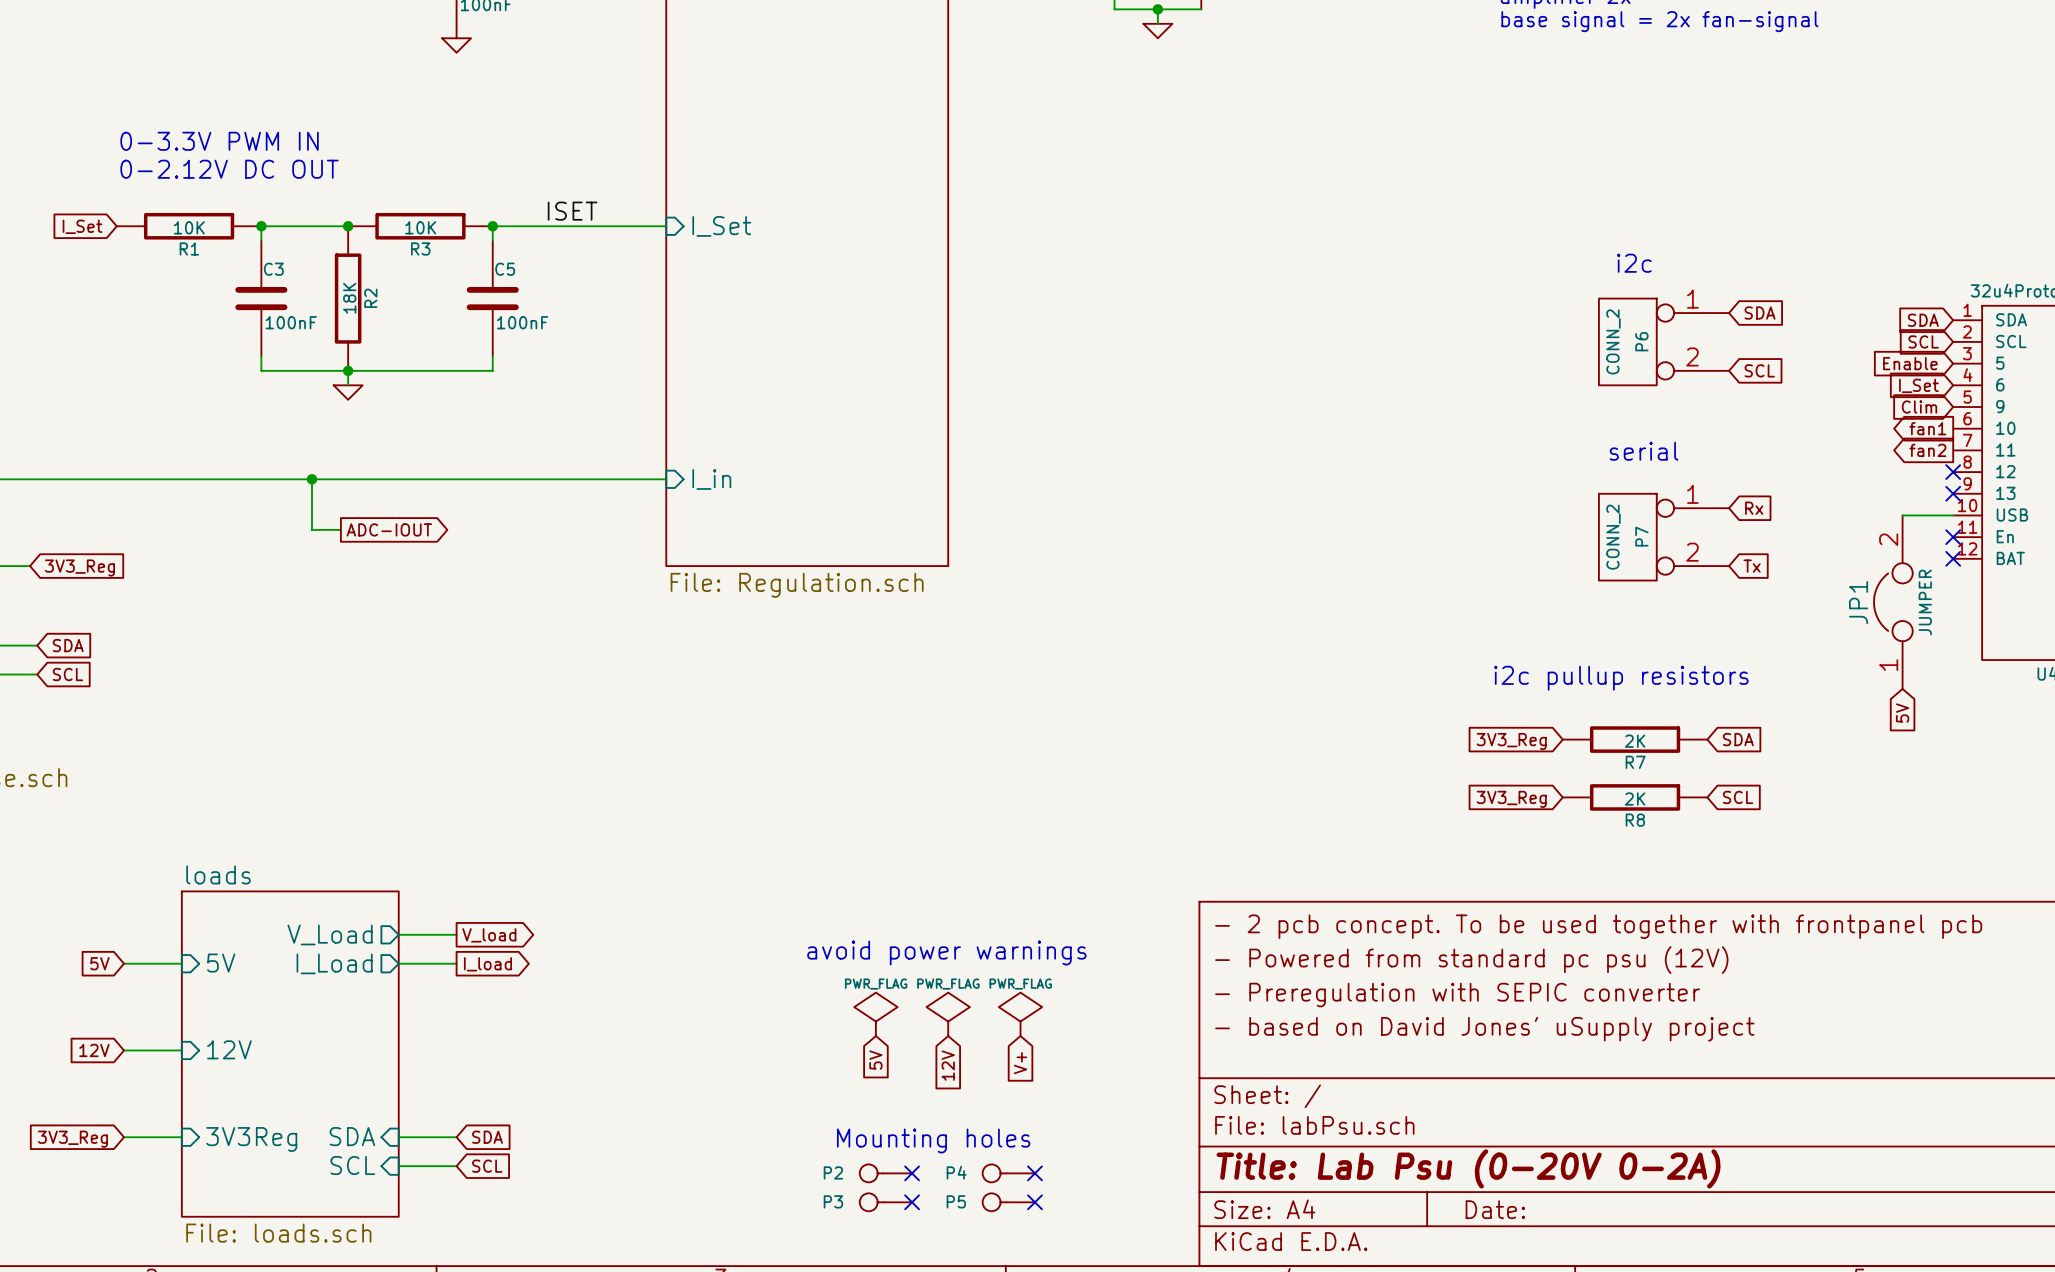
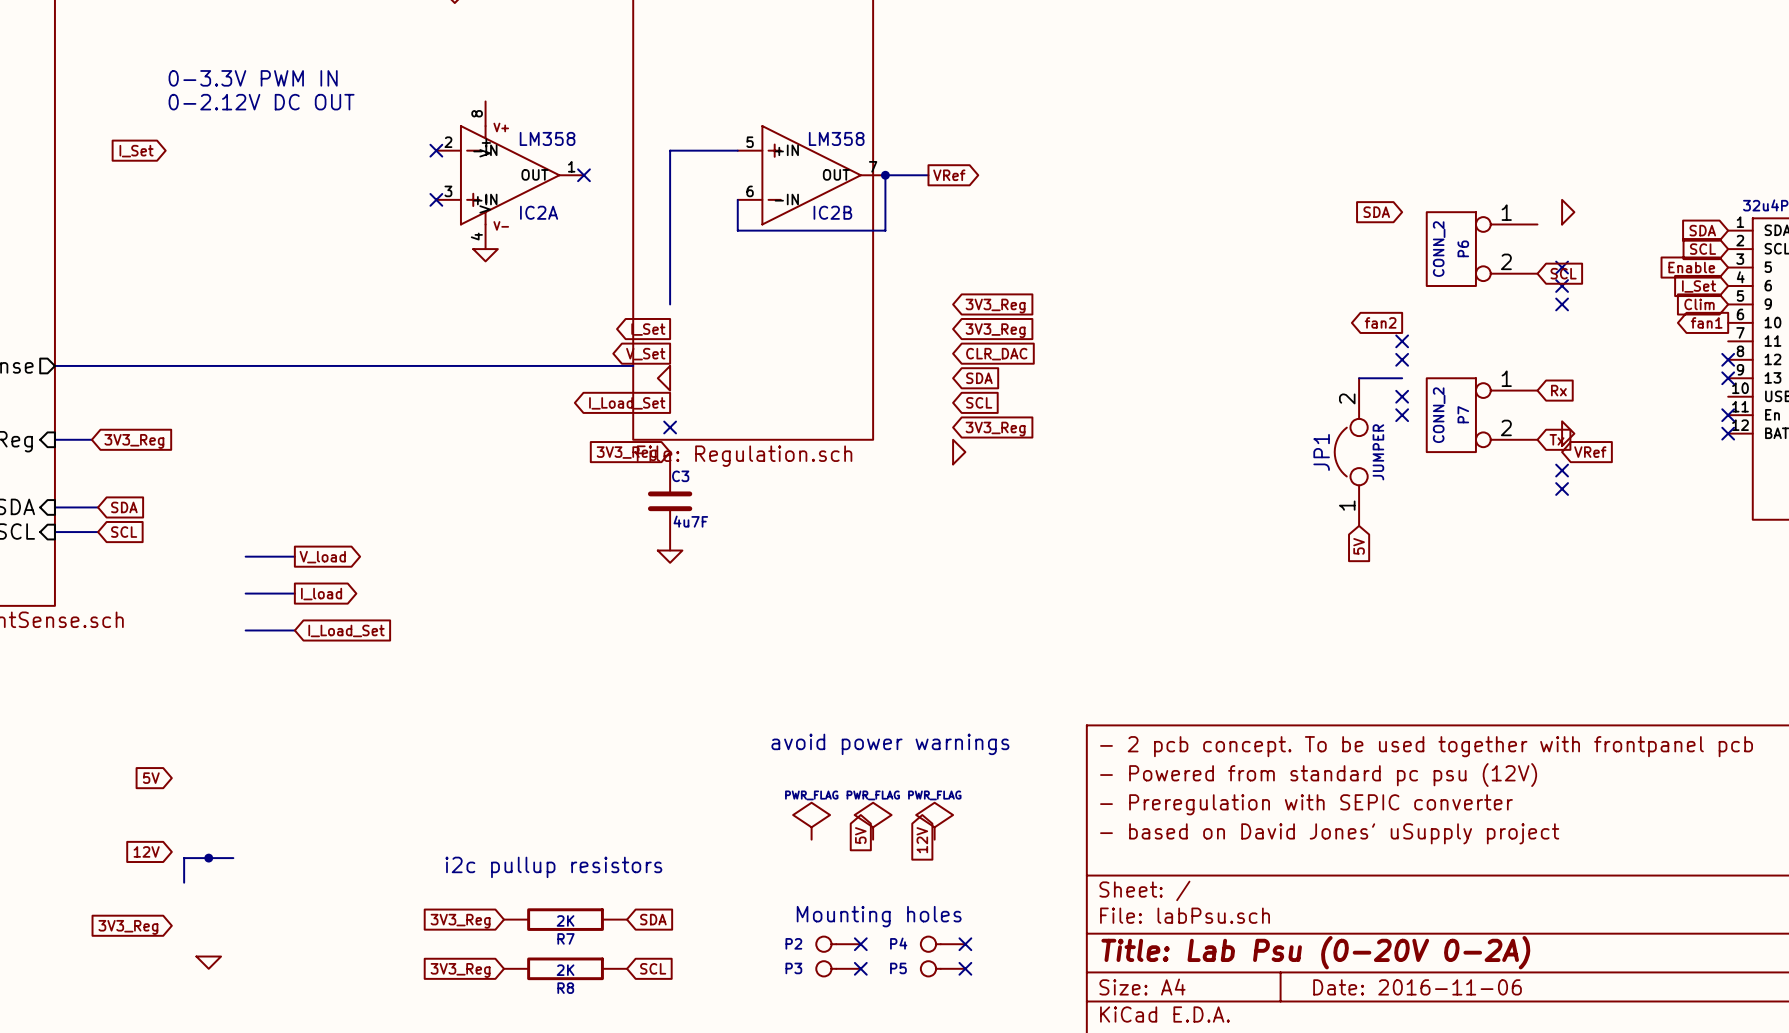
label: ISET (572, 211) -> none
R1: 10K (189, 226) -> none
junction: (261, 226) -> none
wire: (348, 226) (261, 226) (261, 240) -> none
junction: (348, 226) -> none
R3: 10K (420, 226) -> none
no-connect mark: none -> (436, 150)
junction: (492, 226) -> none
wire: (666, 226) (492, 226) (492, 240) -> none
sheet pin: I_Set (721, 226) -> none
wire: none -> (737, 150) (670, 150) (670, 304)
IC2A: none -> LM358 (510, 175)
no-connect mark: none -> (583, 175)
IC2B: none -> LM358 (811, 175)
junction: none -> (885, 175)
wire: none -> (928, 175) (885, 175) (885, 230) (737, 230) (737, 199)
global label: none -> VRef (949, 175)
text: i2c (1634, 263) -> none
no-connect mark: none -> (436, 199)
C3 position: (261, 298) -> (670, 501)
R2: 18K (348, 298) -> none
C5: 100nF (492, 298) -> none
power symbol: none -> (1568, 212)
global label rotation: 0° (1760, 313) -> 180° (1376, 212)
global label position: SDA (1760, 313) -> SDA (1376, 212)
C3 value: 100nF (291, 322) -> 4u7F (690, 521)
wire: (261, 356) (261, 370) (492, 370) (492, 356) -> none
no-connect mark: none -> (1562, 267)
wire: (348, 370) (348, 385) -> none
junction: (348, 370) -> none
no-connect mark: none -> (1562, 285)
power symbol position: (348, 392) -> (485, 255)
no-connect mark: none -> (1562, 304)
global label: none -> 3V3_Reg (995, 306)
global label: none -> fan2 (1380, 322)
global label: none -> I_Set (648, 329)
global label: none -> 3V3_Reg (995, 330)
no-connect mark: none -> (1402, 341)
global label: fan2 (1927, 450) -> none
text: serial (1644, 451) -> none
global label: none -> V_Set (645, 354)
global label: none -> CLR_DAC (996, 354)
no-connect mark: none -> (1402, 359)
wire: (311, 479) (311, 529) (340, 529) -> none
junction: (311, 479) -> none
sheet pin: I_in (711, 479) -> none
power symbol: none -> (663, 378)
global label: none -> SDA (979, 378)
wire: none -> (1359, 378) (1402, 378)
no-connect mark: none -> (1402, 396)
wire: (1902, 515) (1953, 515) -> none
global label: none -> SCL (979, 402)
global label: none -> I_Load_Set (627, 403)
global label: ADC-IOUT (389, 529) -> none
no-connect mark: none -> (1402, 415)
no-connect mark: none -> (670, 427)
global label: none -> 3V3_Reg (995, 429)
power symbol: none -> (1568, 433)
power symbol: none -> (959, 452)
global label: none -> VRef (1590, 452)
global label: none -> 3V3_Reg (626, 453)
no-connect mark: none -> (1562, 470)
JP1 position: (1893, 602) -> (1351, 452)
no-connect mark: none -> (1562, 489)
text: i2c pullup resistors (1621, 678) -> none
global label: none -> 5V (1359, 546)
global label: none -> V_load (322, 557)
power symbol: none -> (670, 556)
global label: 5V (1902, 713) -> none
R7 position: (1635, 739) -> (565, 919)
global label: SDA (1738, 739) -> none
global label: 3V3_Reg (1511, 741) -> none
global label: none -> I_load (321, 594)
global label: none -> I_Load_Set (346, 630)
R8 position: (1635, 797) -> (565, 968)
global label: SCL (1738, 797) -> none
global label: 3V3_Reg (1511, 799) -> none
sheet pin: V_Load (330, 934) -> none
wire: (398, 934) (456, 934) -> (245, 593) (294, 593)
global label: V_load (489, 935) -> none
text position: avoid power warnings (946, 952) -> avoid power warnings (890, 744)
wire: (124, 963) (181, 963) -> (245, 556) (294, 556)
sheet pin: 5V (221, 963) -> none
sheet pin: I_Load (334, 963) -> none
wire: (398, 963) (456, 963) -> none
global label: I_load (487, 964) -> none
sheet pin: 12V (229, 1049) -> none
wire: (124, 1050) (181, 1050) -> (245, 630) (294, 630)
sheet loads: File: loads.sch (290, 1054) -> none
junction: none -> (208, 858)
wire: none -> (233, 858) (184, 858) (184, 882)
global label position: 5V (875, 1060) -> 5V (860, 835)
global label: V+ (1020, 1063) -> none
global label position: 12V (948, 1065) -> 12V (922, 840)
text: none -> i2c pullup resistors (553, 867)
global label: none -> 3V3_Reg (460, 921)
sheet pin: SDA (352, 1136) -> none
wire: (124, 1137) (181, 1137) -> none
wire: (398, 1137) (456, 1137) -> none
global label position: SDA (487, 1137) -> SDA (653, 919)
sheet pin: 3V3Reg (251, 1139) -> none
text position: Mounting holes (933, 1140) -> Mounting holes (879, 916)
no-connect mark: none -> (860, 944)
no-connect mark: none -> (965, 944)
sheet pin: SCL (352, 1165) -> none
wire: (398, 1166) (456, 1166) -> none
global label position: SCL (487, 1166) -> SCL (653, 968)
P2 position: (885, 1173) -> (838, 944)
no-connect mark: (912, 1173) -> none
P4 position: (1008, 1173) -> (943, 944)
no-connect mark: (1034, 1173) -> none
power symbol: none -> (208, 962)
no-connect mark: none -> (860, 968)
no-connect mark: none -> (965, 968)
global label: none -> 3V3_Reg (460, 970)
P3 position: (885, 1202) -> (838, 968)
no-connect mark: (912, 1202) -> none
P5 position: (1008, 1202) -> (943, 968)
no-connect mark: (1034, 1202) -> none
title block: Date: (1495, 1209) -> Date: 2016-11-06 (1417, 987)

